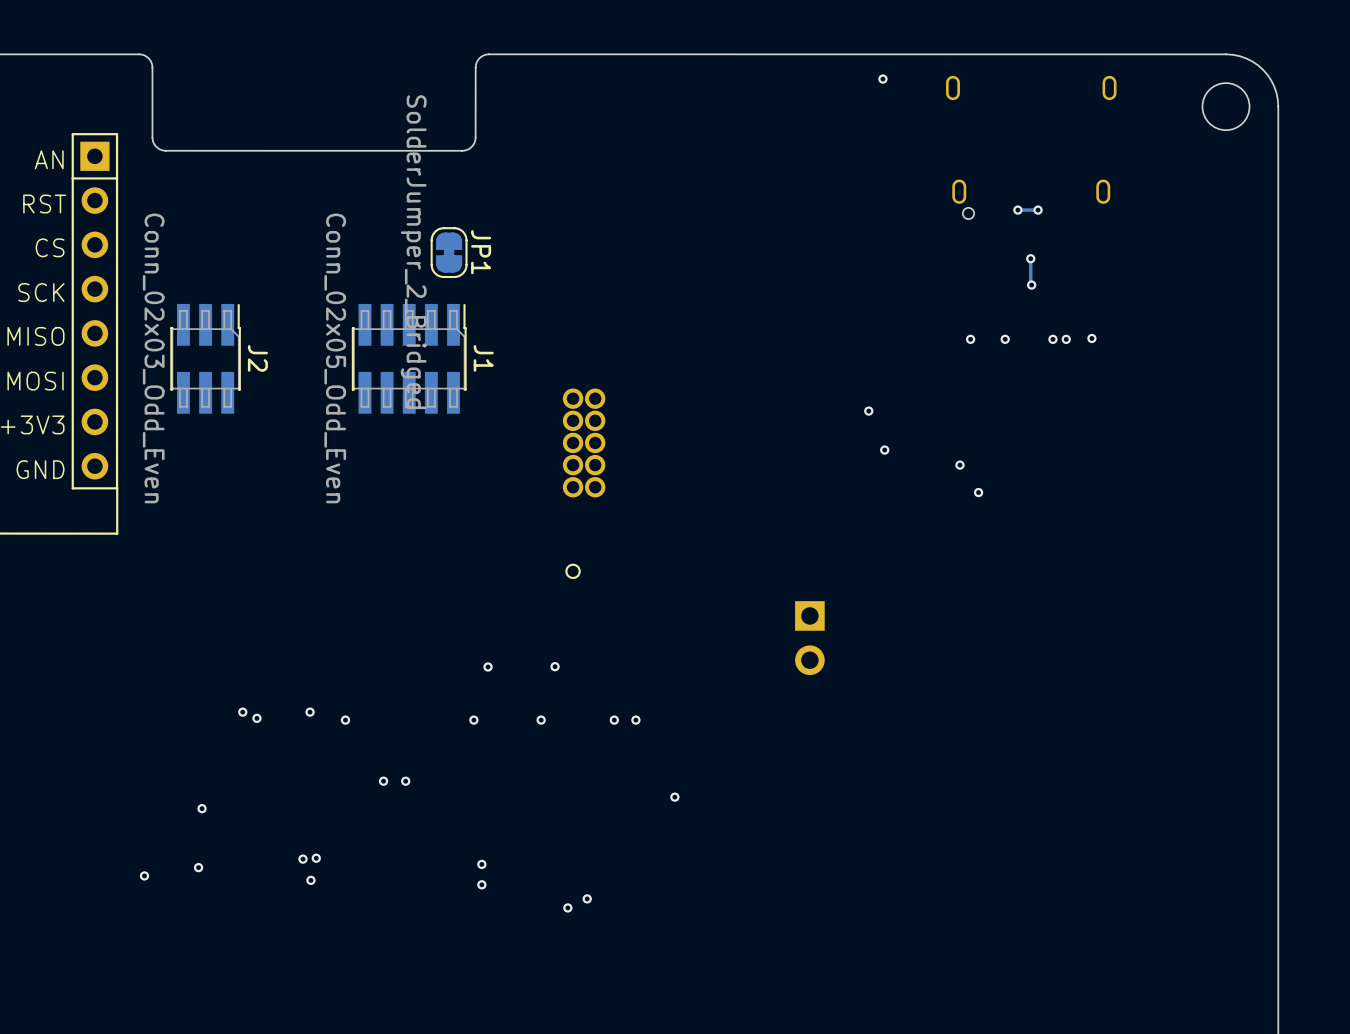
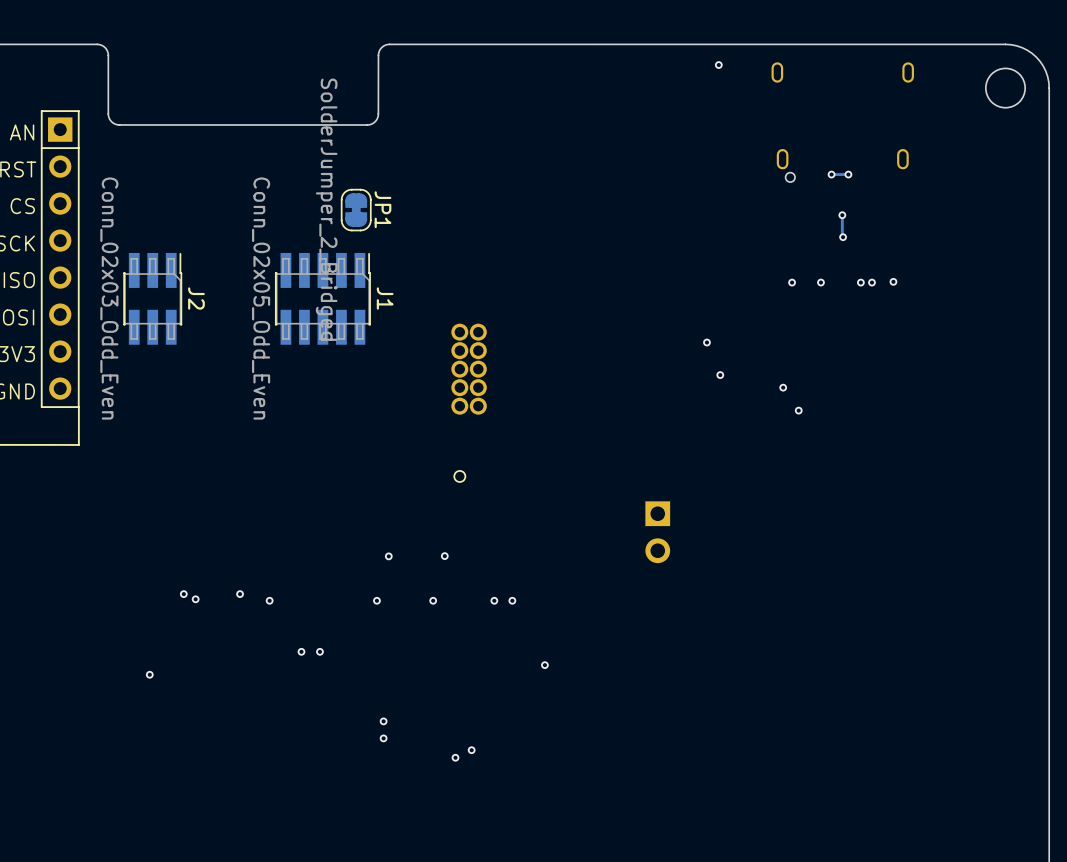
via: (316, 858) -> none
via: (302, 859) -> none
via: (198, 867) -> none
via: (144, 875) -> none
via: (310, 880) -> none

